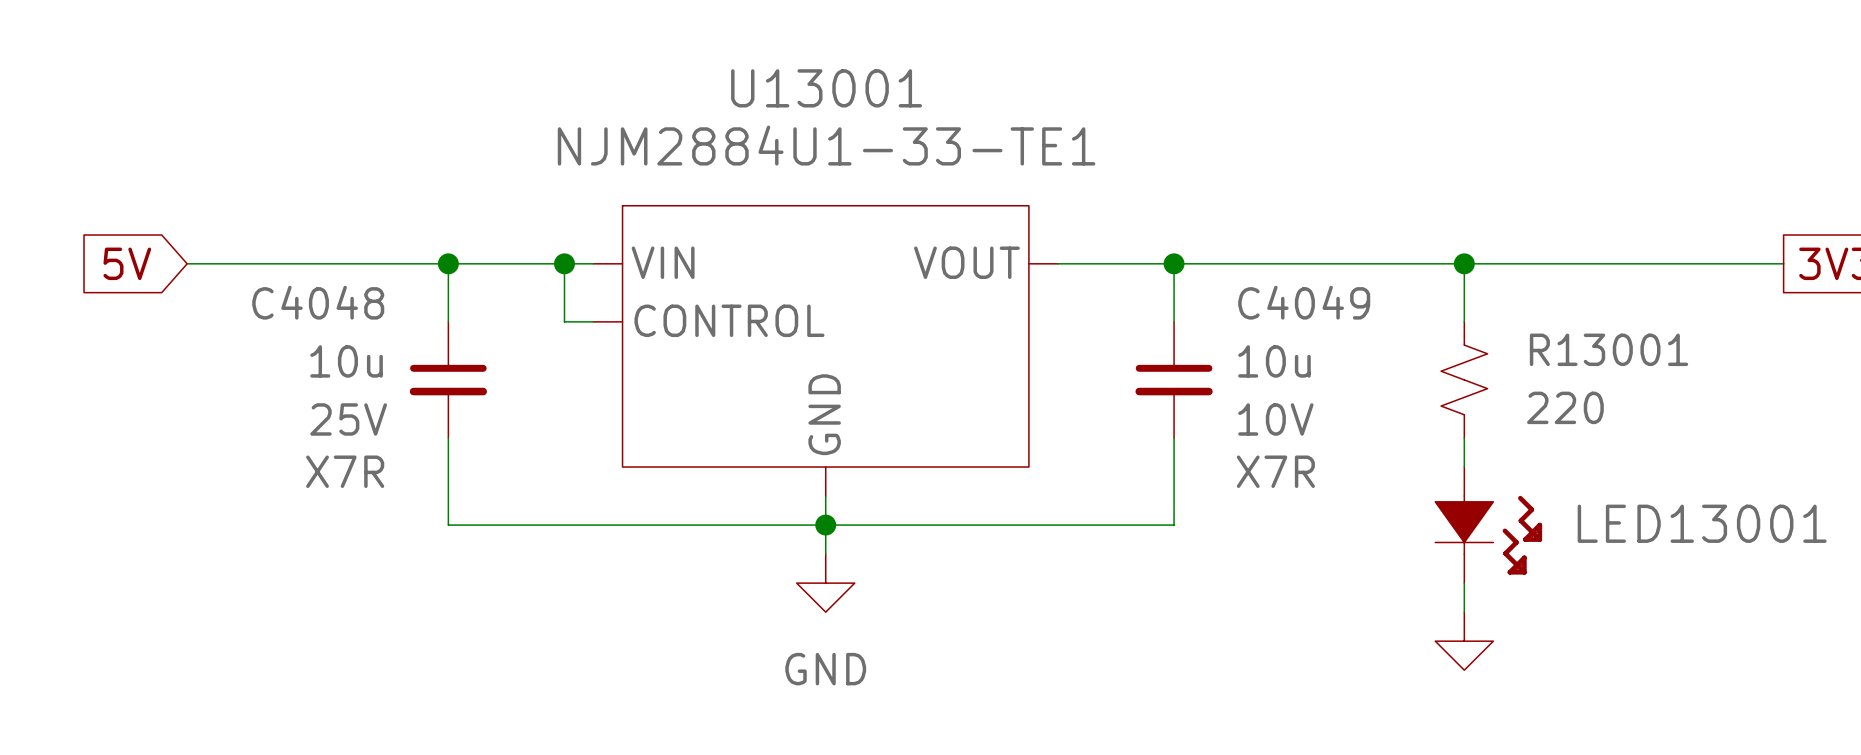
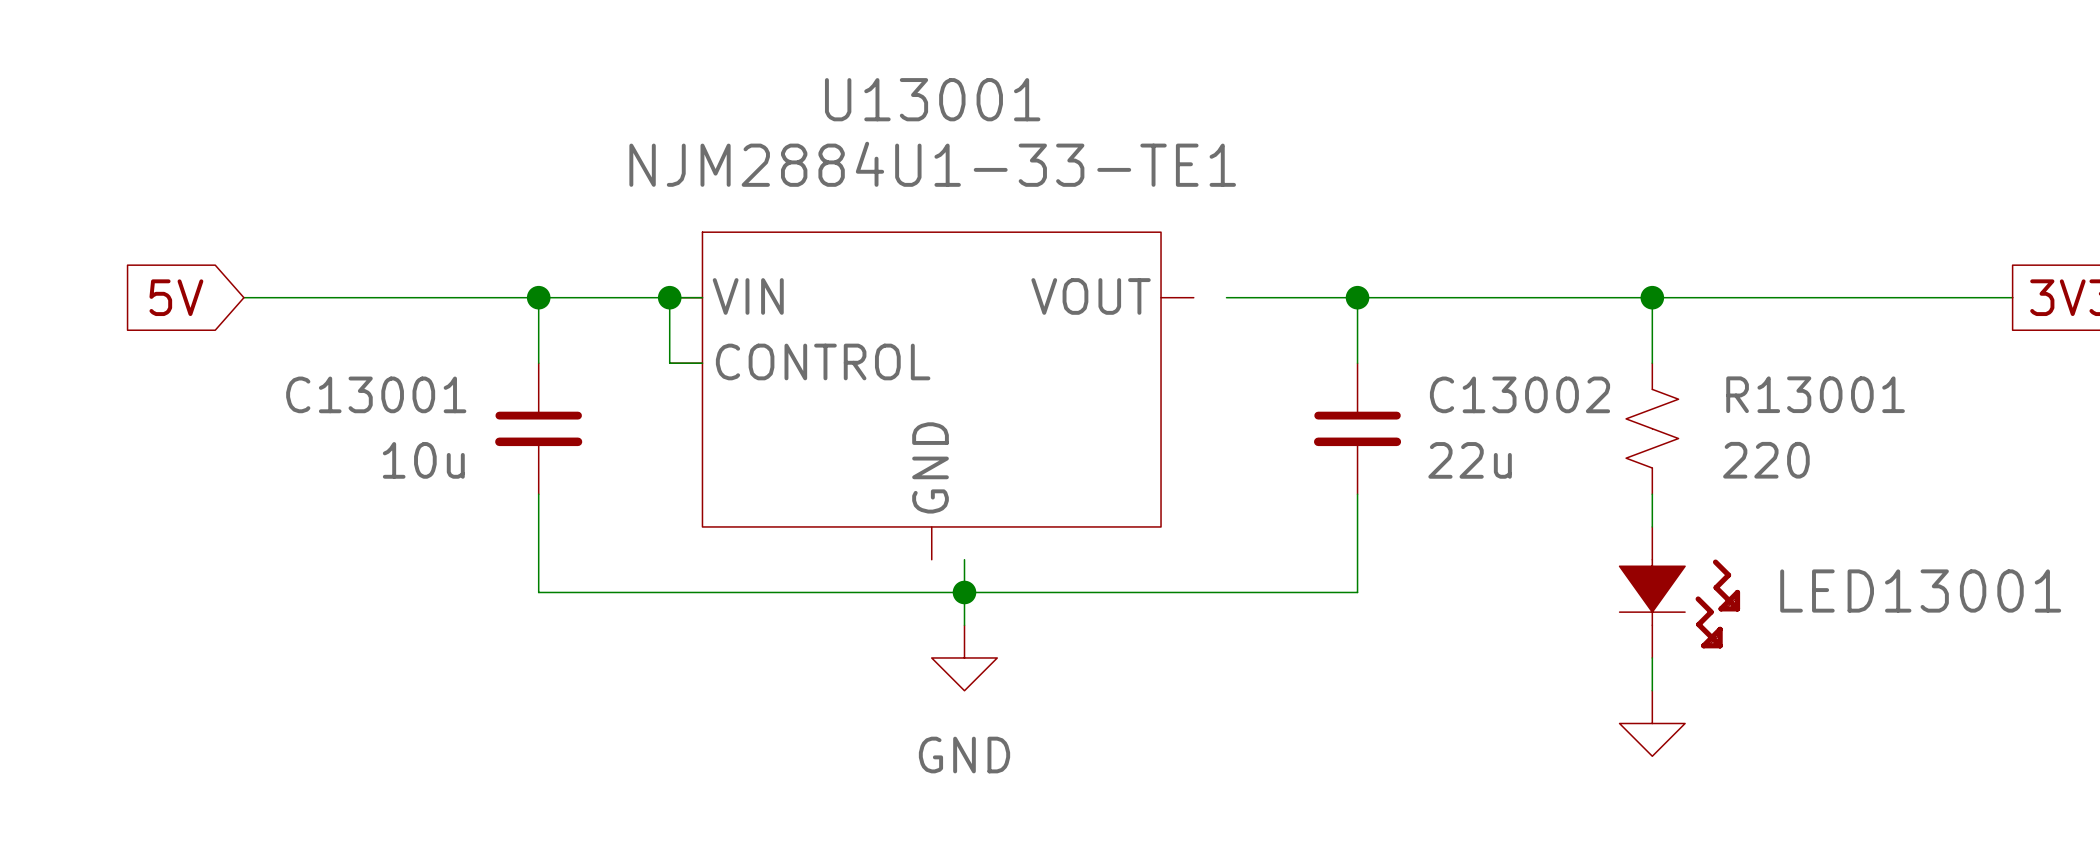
global label position: 5V (127, 263) -> 5V (176, 297)
wire: (187, 263) (216, 263) -> none
wire: (448, 263) (448, 321) -> (538, 297) (538, 363)
junction position: (448, 263) -> (538, 297)
wire: (564, 263) (564, 321) (593, 321) -> none
junction position: (564, 263) -> (669, 297)
wire: none -> (702, 297) (669, 297) (669, 363) (702, 363)
wire: (1057, 263) (1086, 263) -> none
wire: (1174, 263) (1174, 321) -> (1357, 297) (1357, 363)
junction position: (1174, 263) -> (1357, 297)
C4048: 10u (448, 379) -> none
C13001: none -> 10u (538, 428)
C4049: 10u (1174, 379) -> none
C13002: none -> 22u (1357, 428)
wire: (448, 437) (448, 525) (477, 525) -> (538, 494) (538, 592)
wire: (1174, 437) (1174, 525) -> (1357, 494) (1357, 592) (1324, 592)
wire: (825, 496) (825, 554) -> (964, 559) (964, 625)
junction position: (825, 525) -> (964, 592)
power symbol position: GND (825, 583) -> GND (964, 657)

